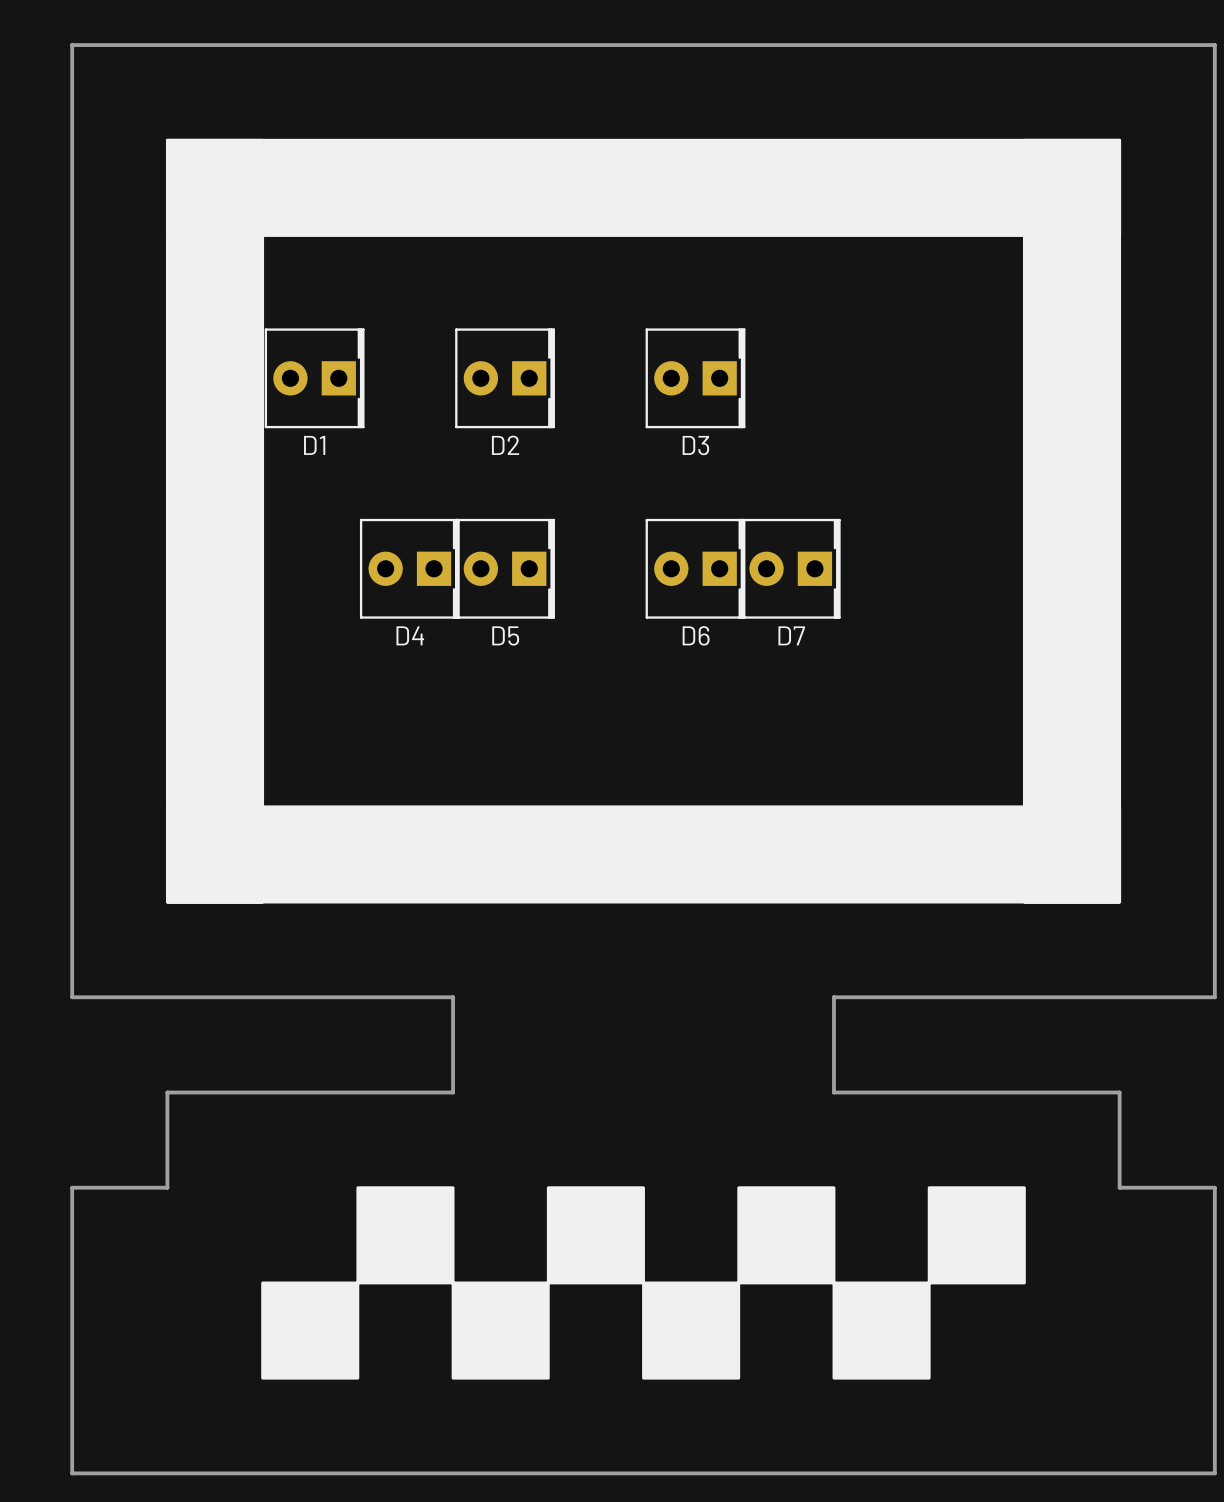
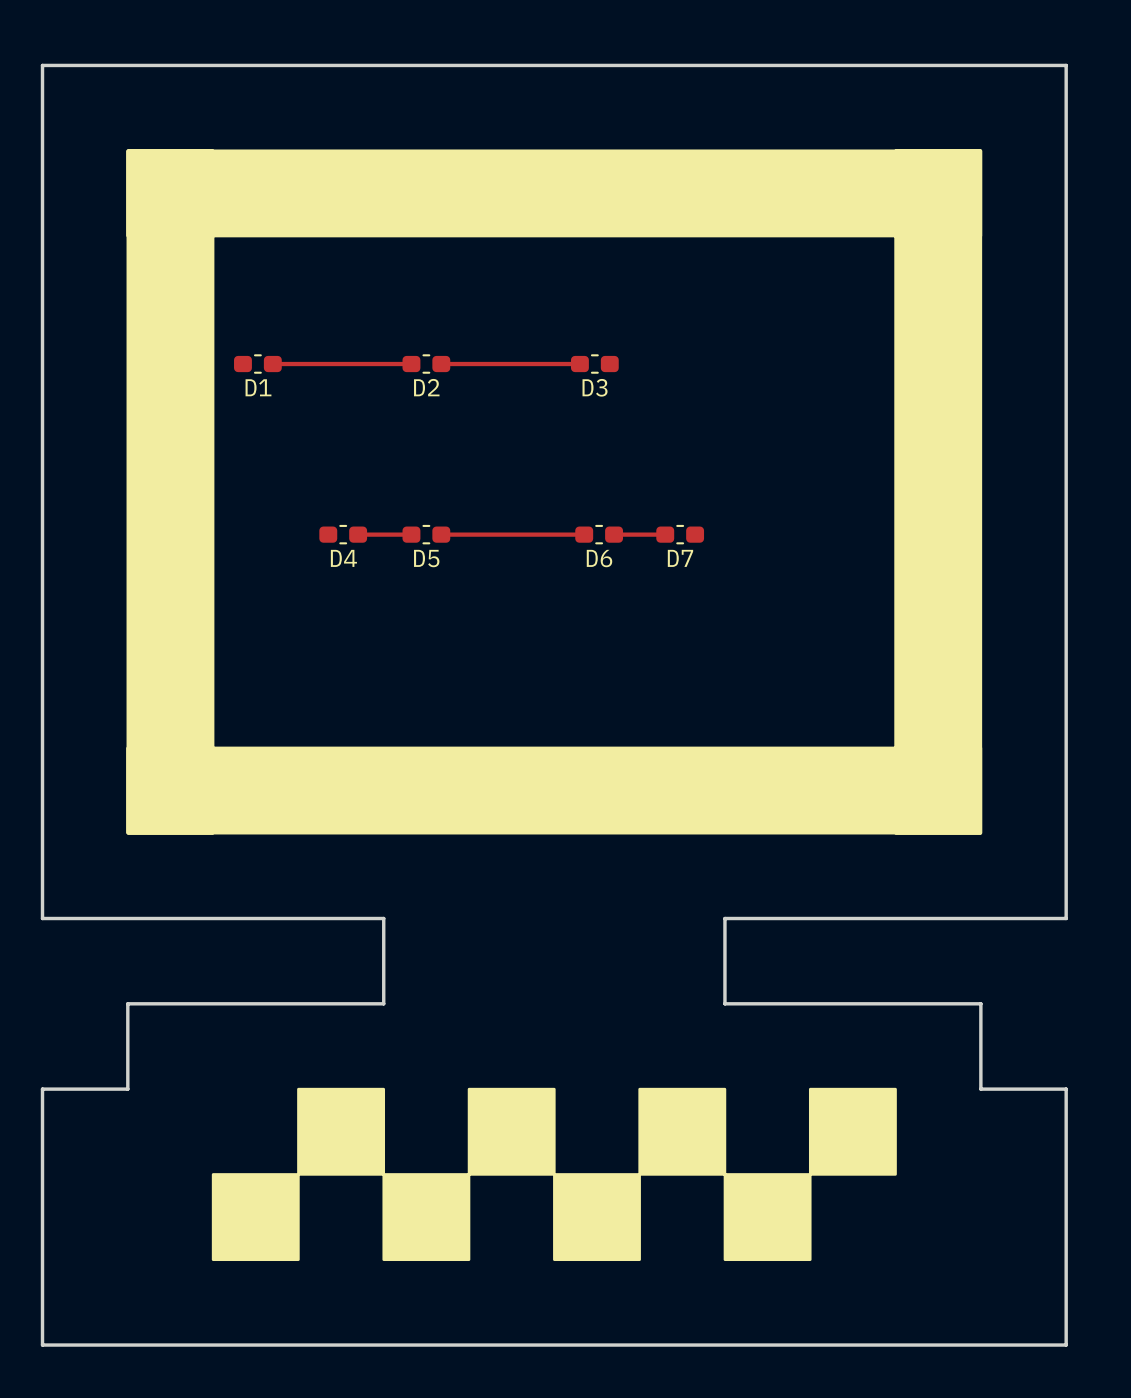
D1 footprint: [264, 328, 365, 429] -> [234, 354, 282, 374]
D2 footprint: [455, 328, 555, 429] -> [402, 354, 451, 374]
D3 footprint: [645, 328, 746, 429] -> [570, 354, 619, 374]
track: none -> (272, 364) (411, 364)
track: none -> (441, 364) (579, 364)
D1 name position: D1 (314, 445) -> D1 (258, 387)
D2 name position: D2 (505, 445) -> D2 (426, 387)
D3 name position: D3 (695, 445) -> D3 (595, 387)
D4 footprint: [359, 518, 460, 619] -> [319, 524, 368, 545]
D5 footprint: [455, 518, 555, 619] -> [402, 524, 451, 545]
D6 footprint: [645, 518, 746, 619] -> [575, 524, 624, 545]
D7 footprint: [740, 518, 841, 619] -> [656, 524, 705, 545]
track: none -> (358, 534) (411, 534)
track: none -> (441, 534) (584, 534)
track: none -> (614, 534) (665, 534)
D4 name position: D4 (410, 635) -> D4 (343, 558)
D5 name position: D5 (505, 635) -> D5 (426, 558)
D6 name position: D6 (696, 635) -> D6 (599, 558)
D7 name position: D7 (791, 635) -> D7 (680, 558)

